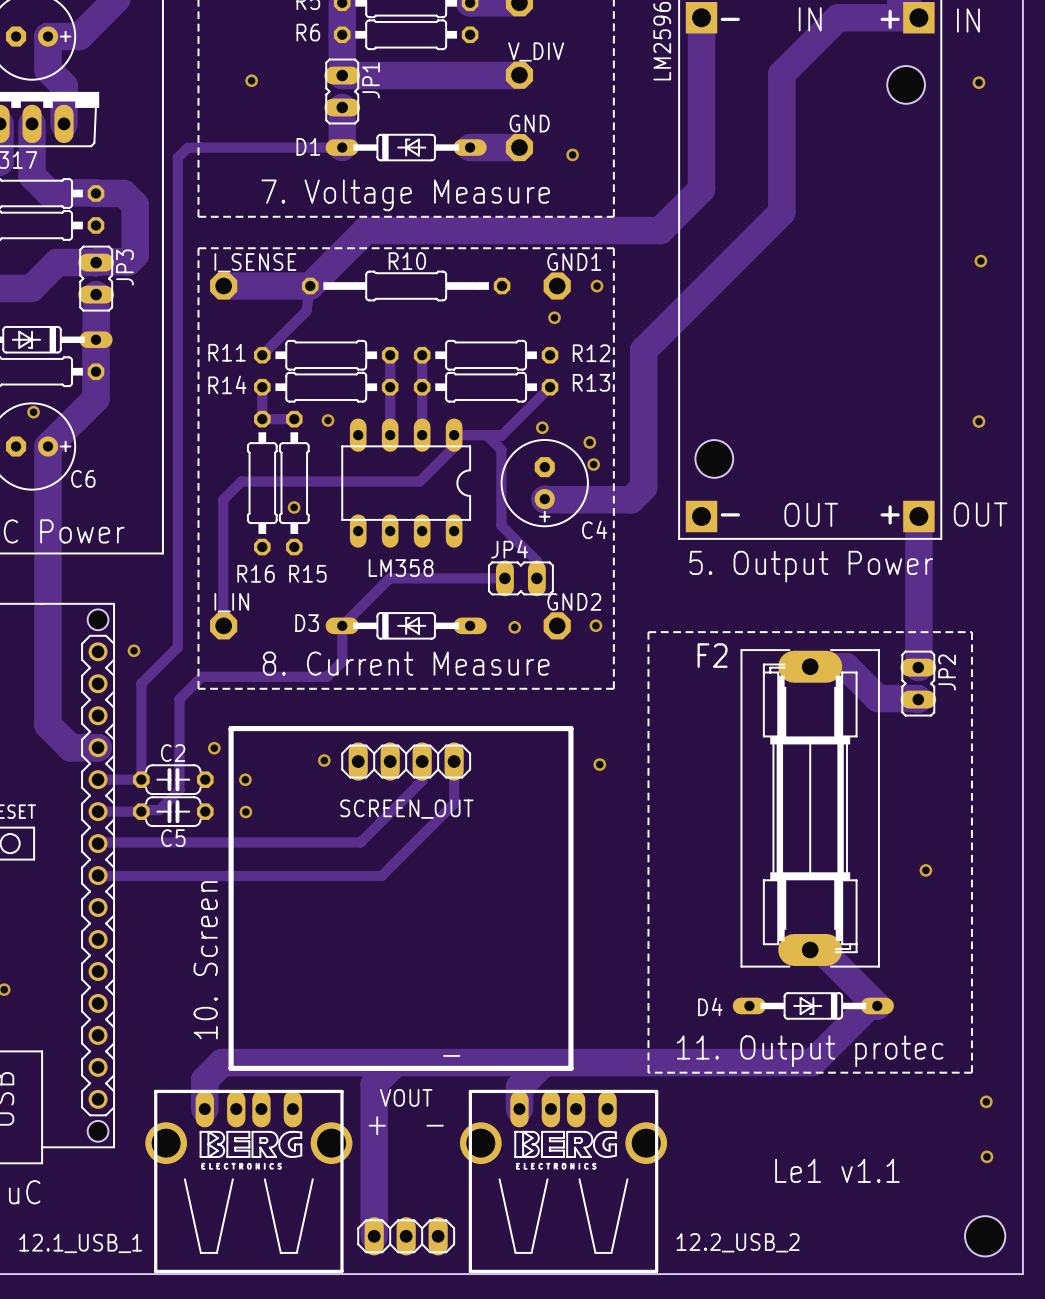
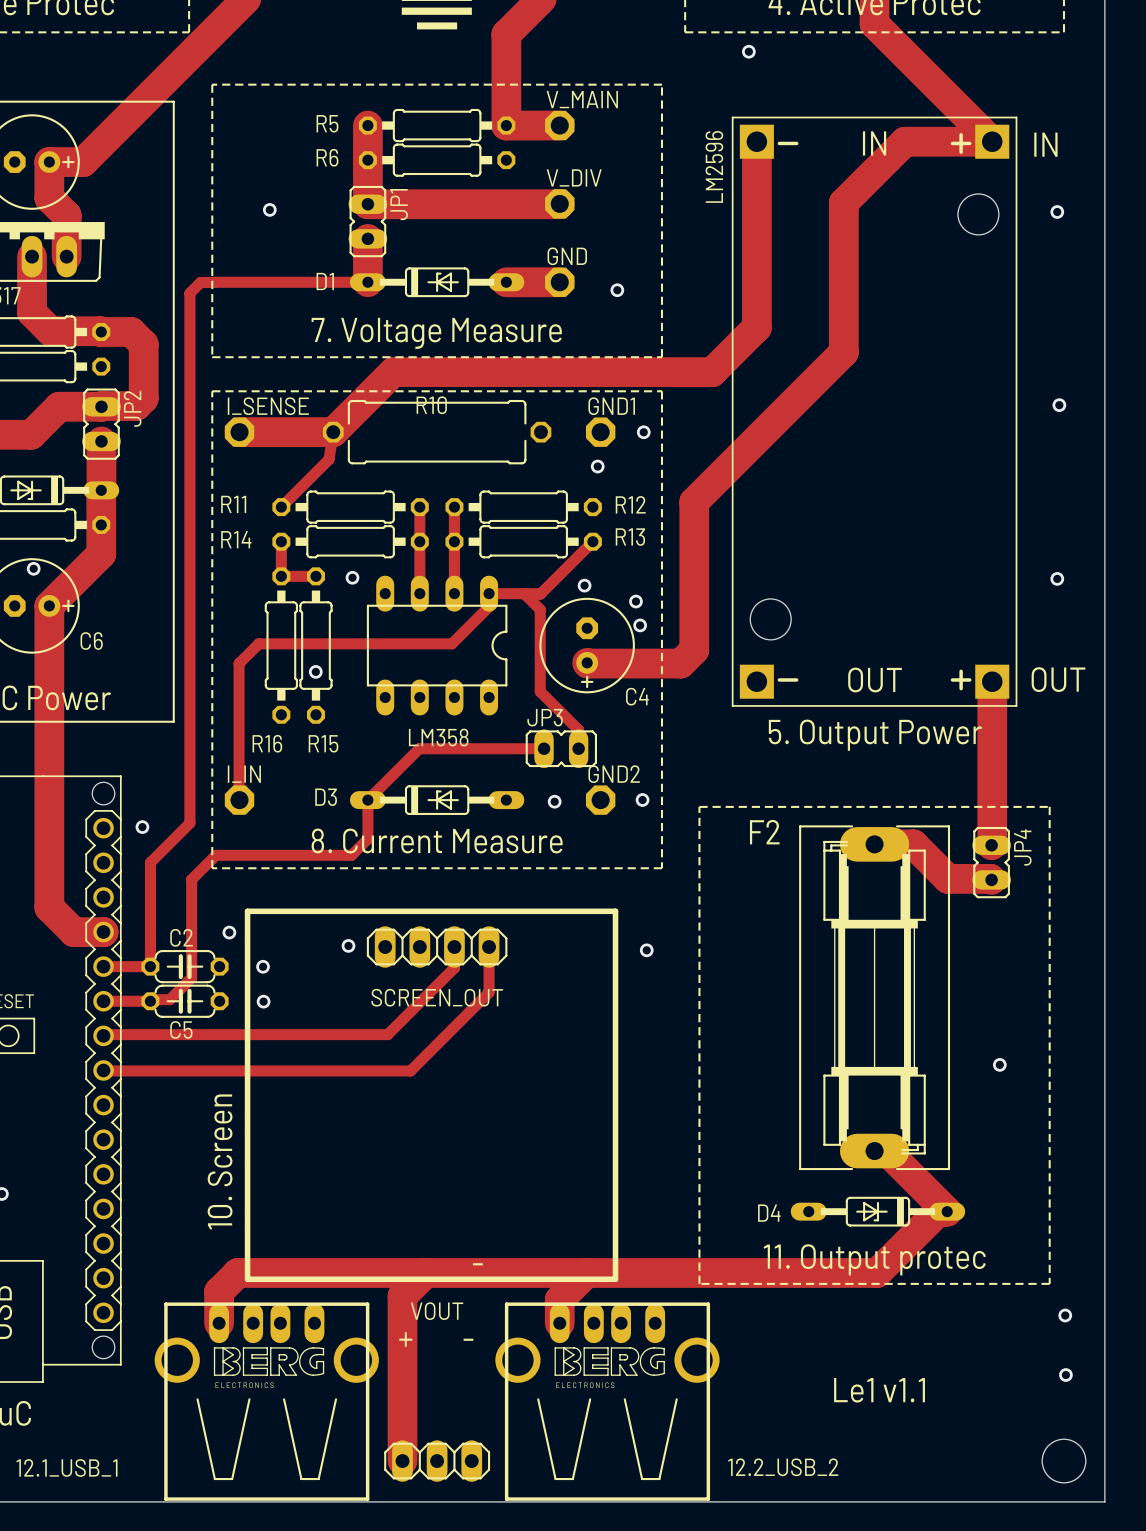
JP3 name: JP3 (124, 267) -> JP2 (132, 408)
R10 footprint: [301, 270, 511, 302] -> [322, 399, 552, 465]
JP4 name: JP4 (509, 549) -> JP3 (545, 717)
JP2 name: JP2 (947, 672) -> JP4 (1022, 847)

